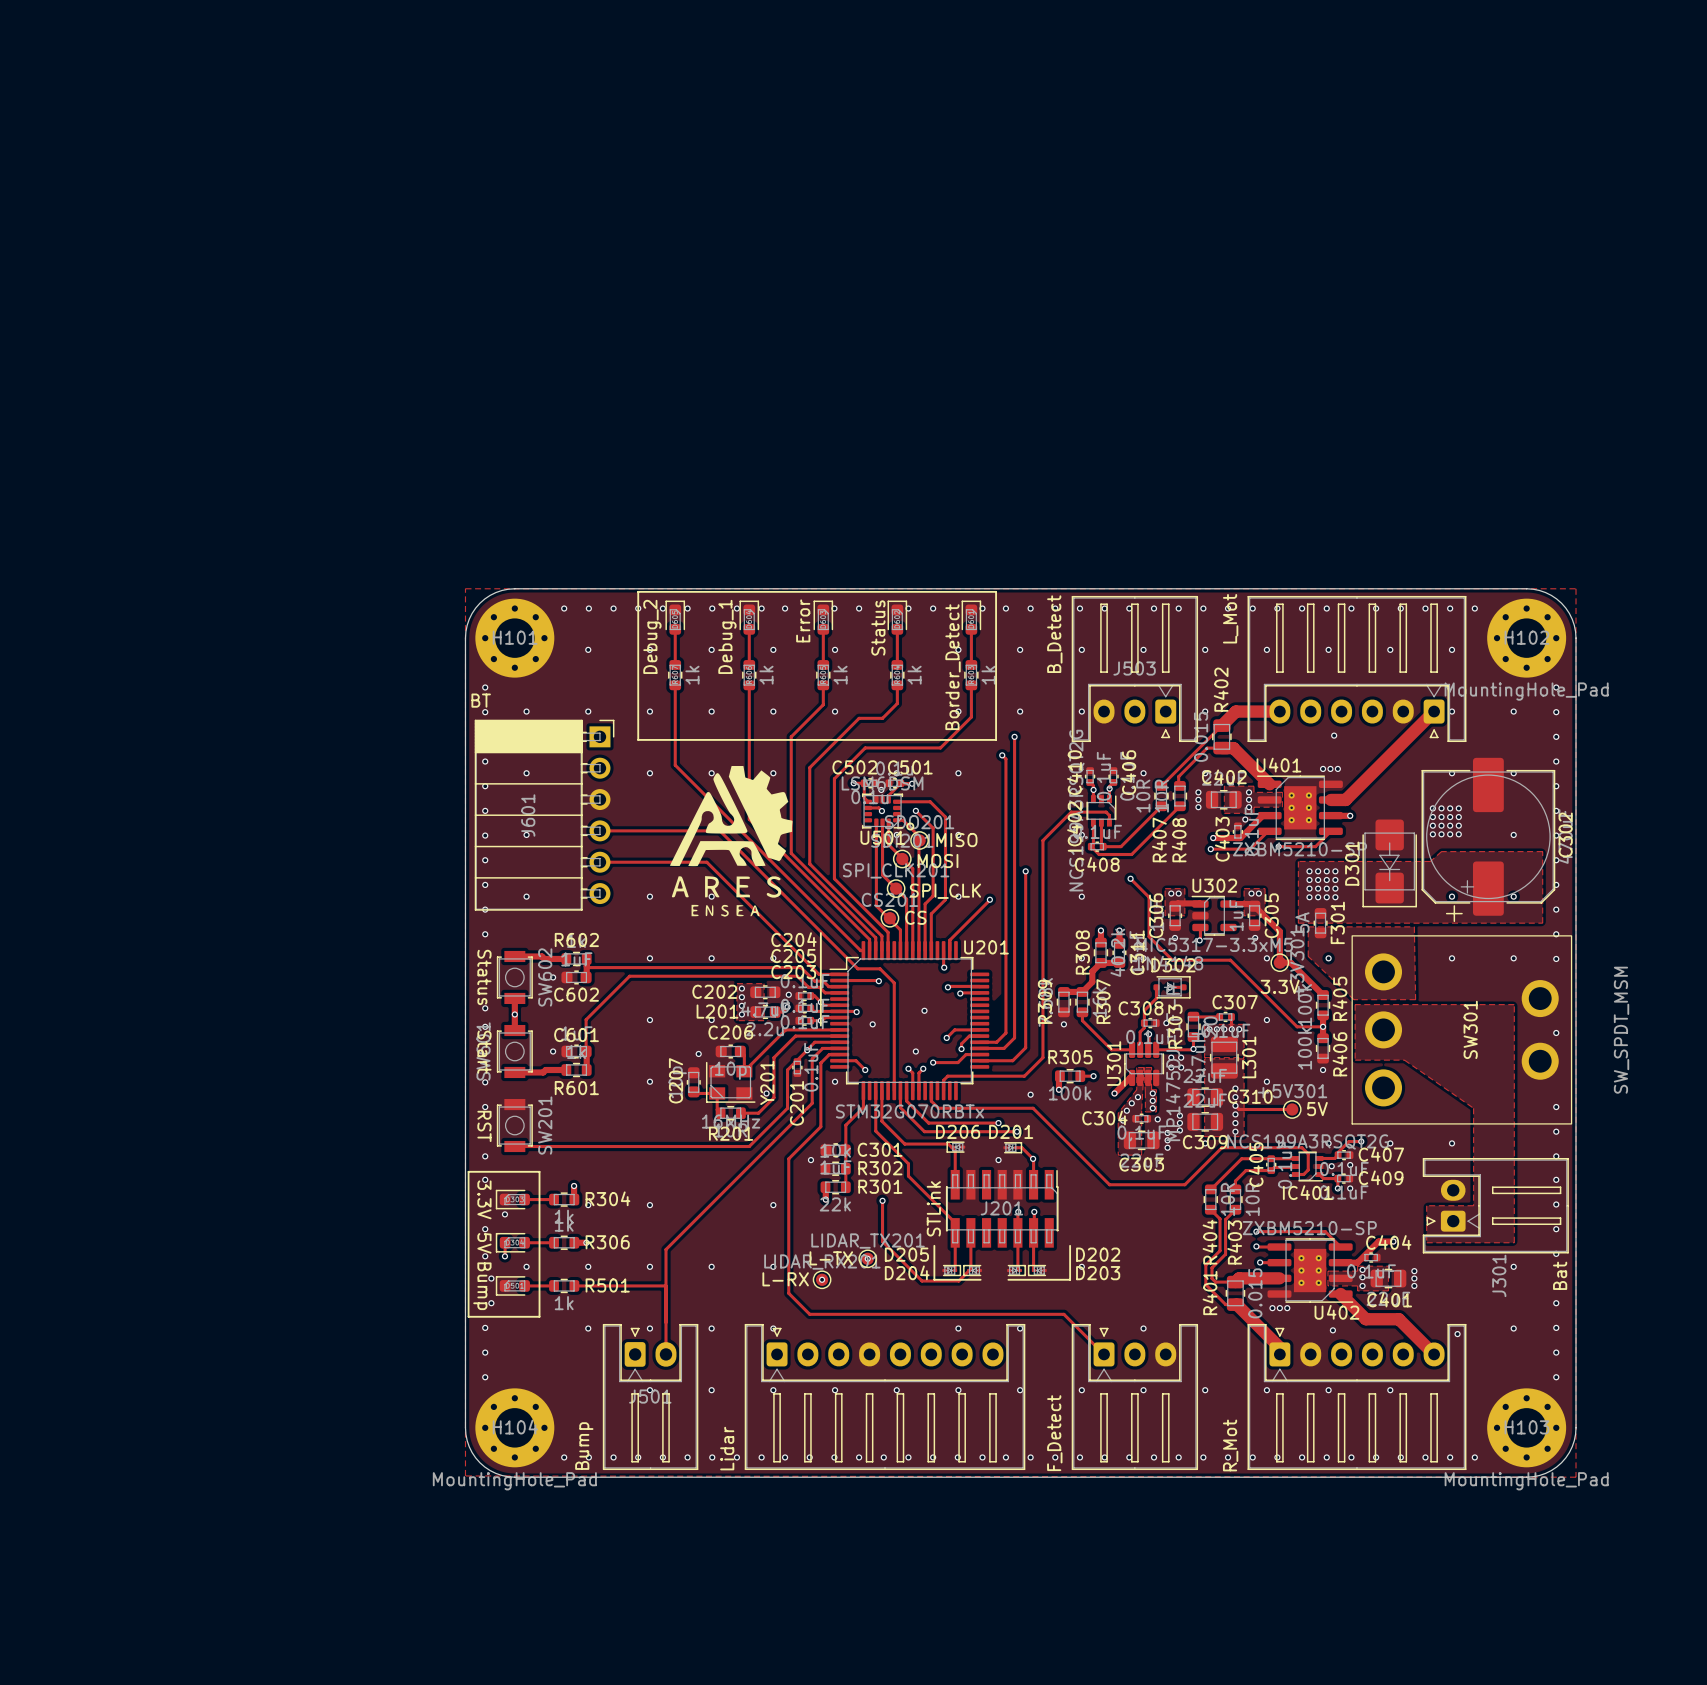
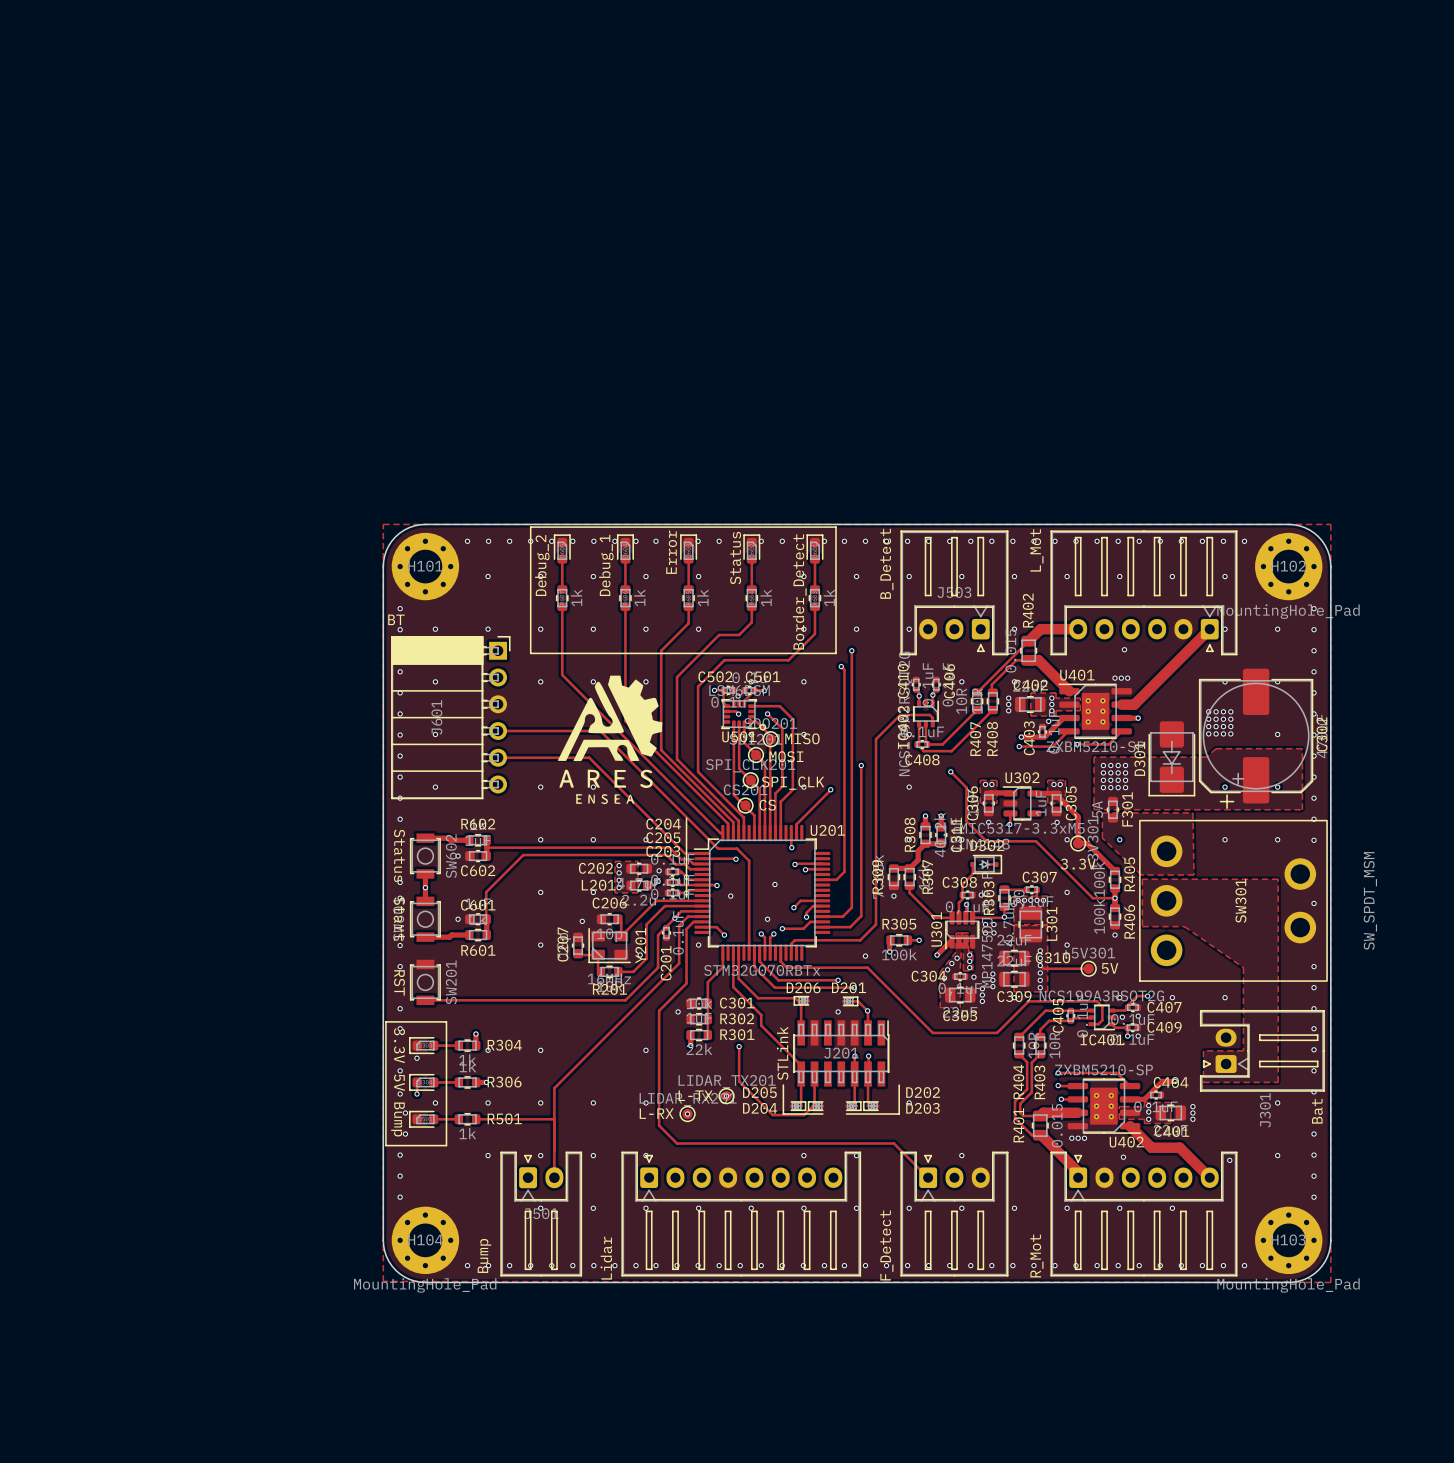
track: (1005, 995) (1005, 1032) (996, 1042) (979, 1042) -> (844, 871) (836, 879) (822, 879)

